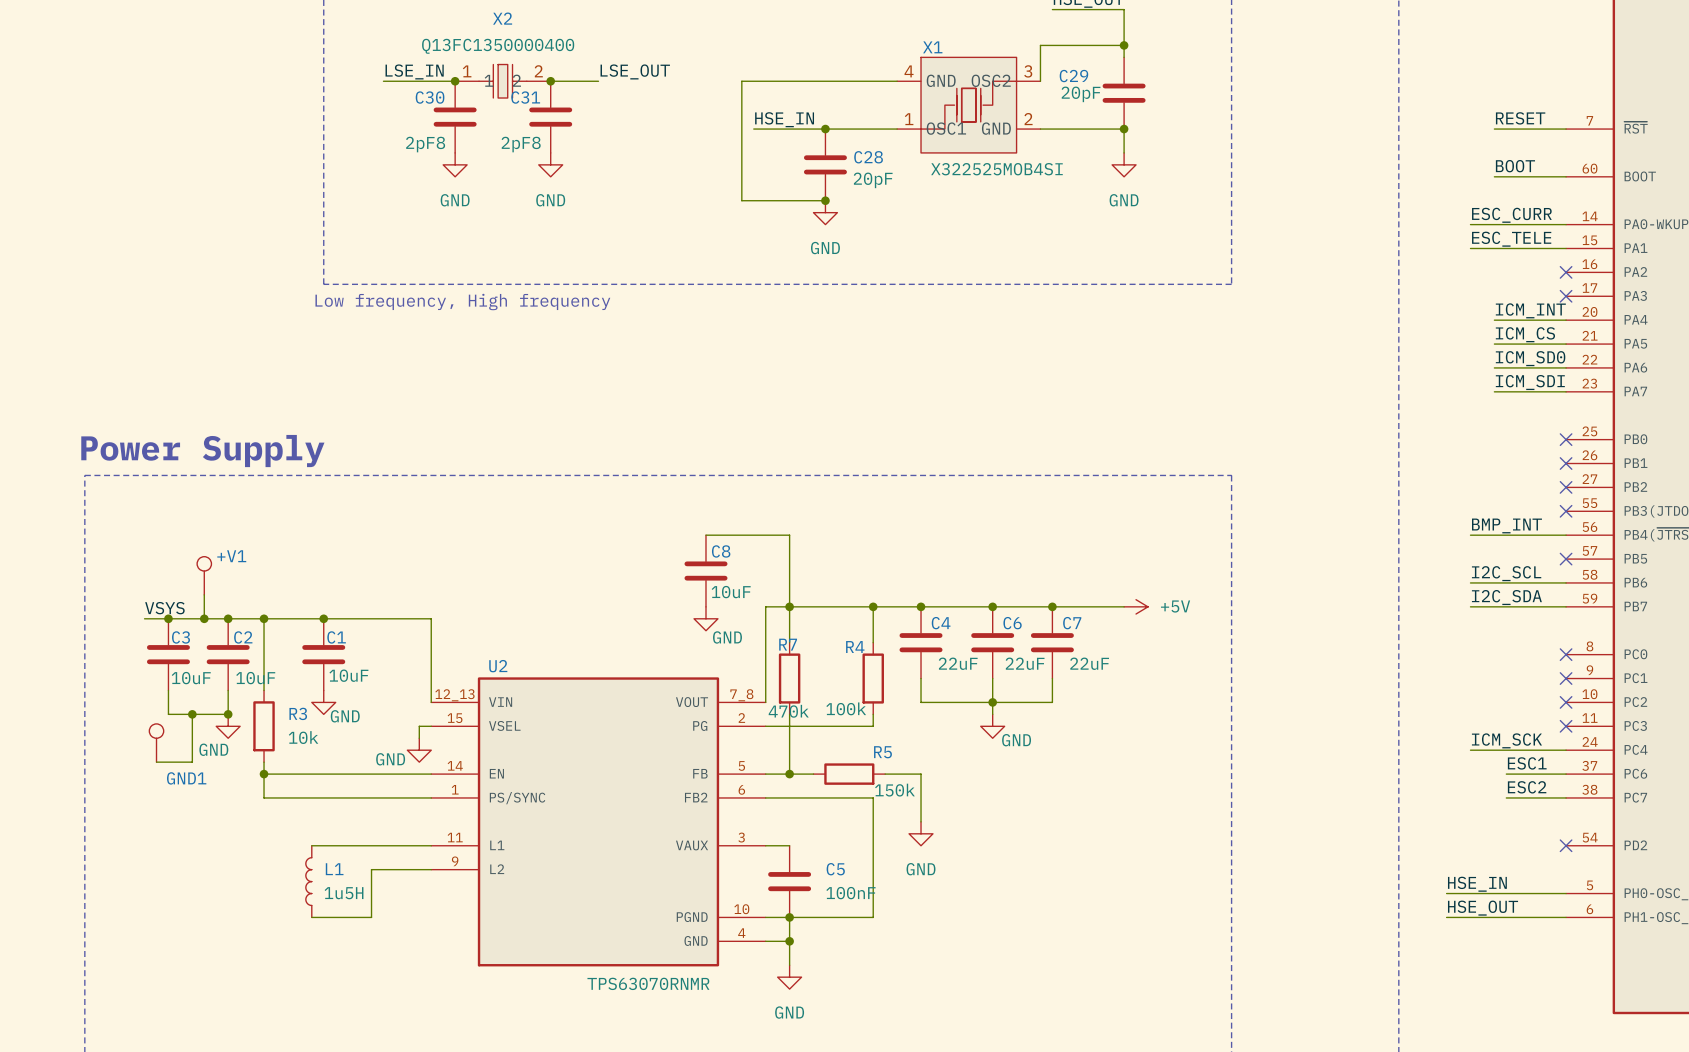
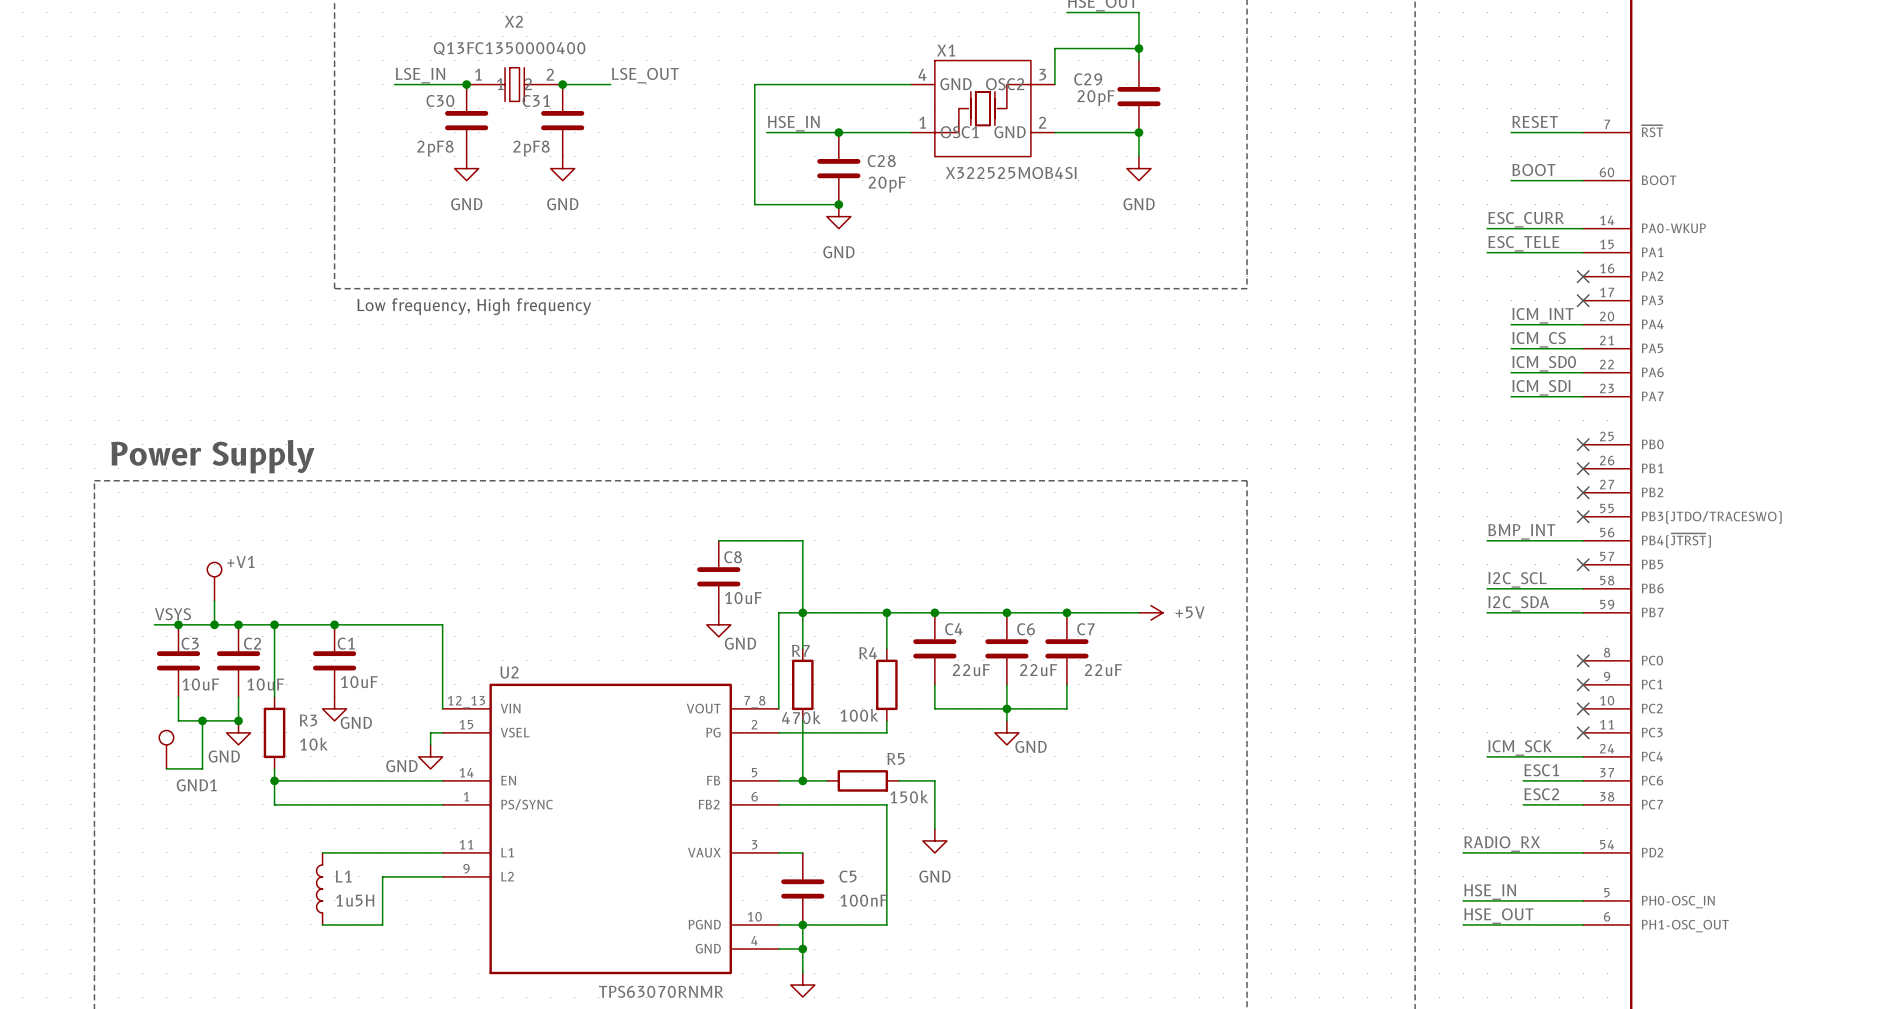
label: none -> RADIO_RX (1502, 844)
wire: none -> (1463, 852) (1583, 852)
no-connect mark: (1566, 845) -> none

